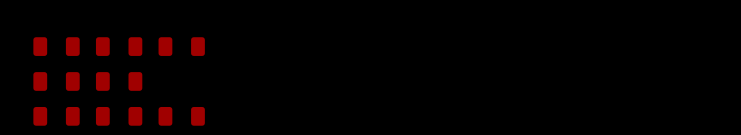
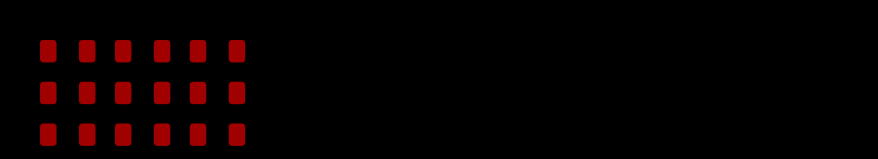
part: none -> (217, 92)

